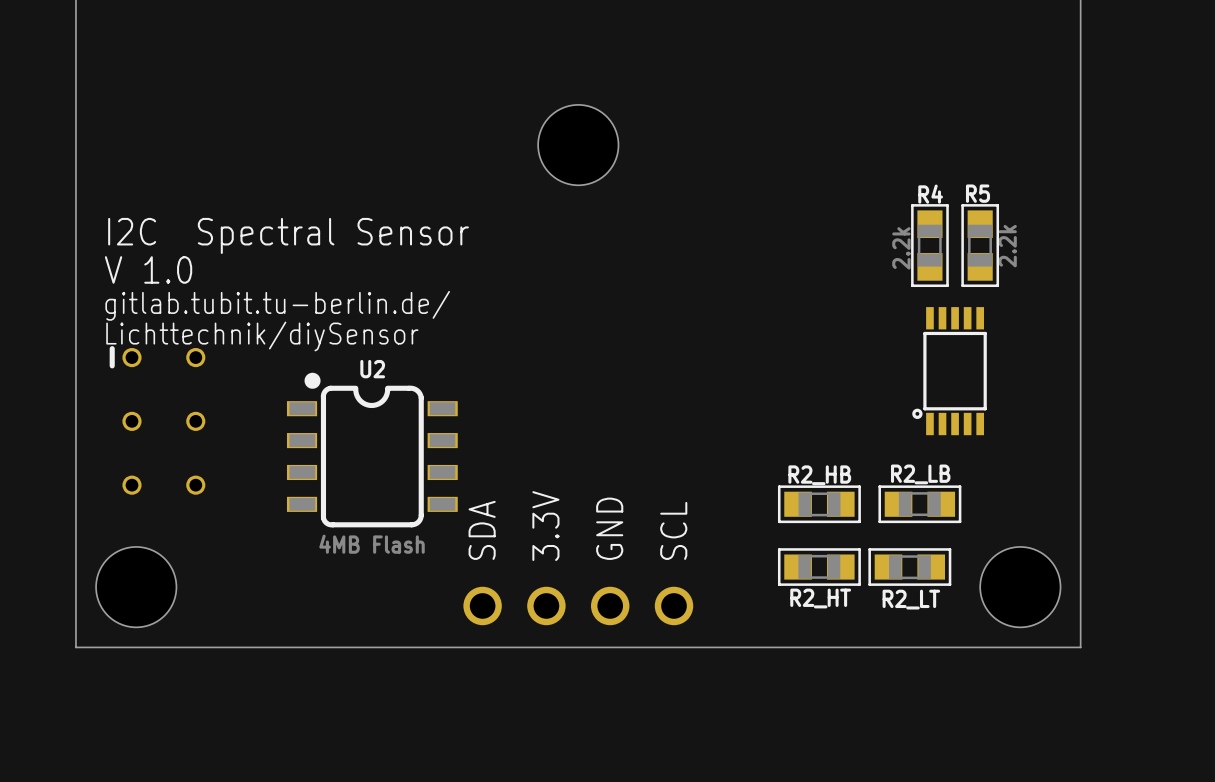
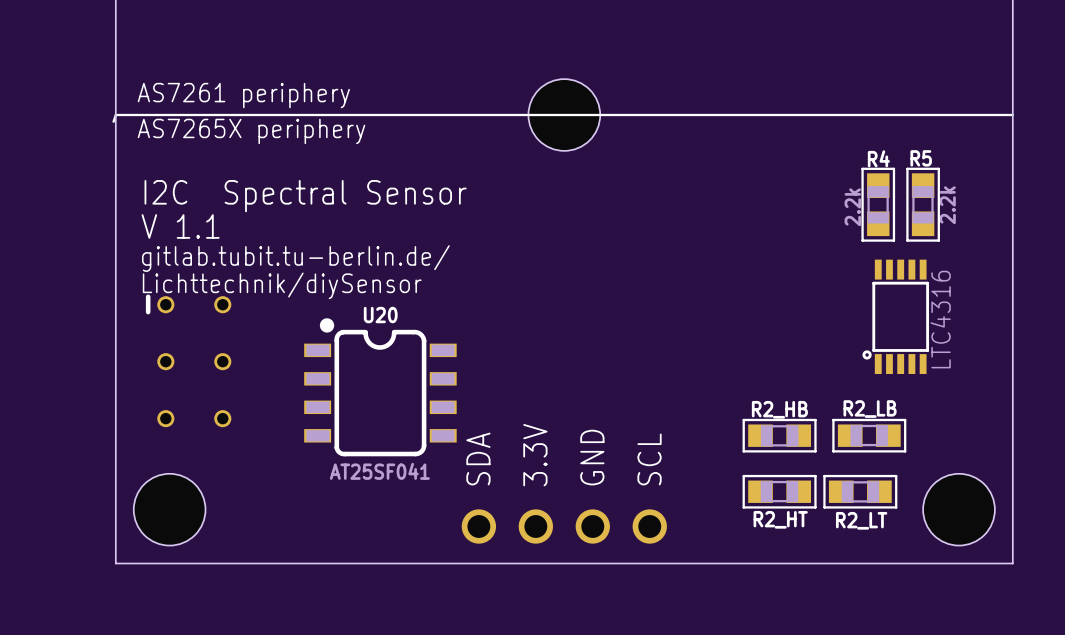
text: none -> AS7261 periphery (243, 95)
line: none -> (1012, 115) (115, 115) (113, 121)
text: none -> AS7265X periphery (251, 131)
text: V 1.0 (148, 269) -> V 1.1 (180, 226)
U2 name: U2 (372, 369) -> U20 (380, 315)
part text: none -> LTC4316 (940, 319)
U2 value: 4MB Flash (372, 544) -> AT25SF041 (379, 471)

